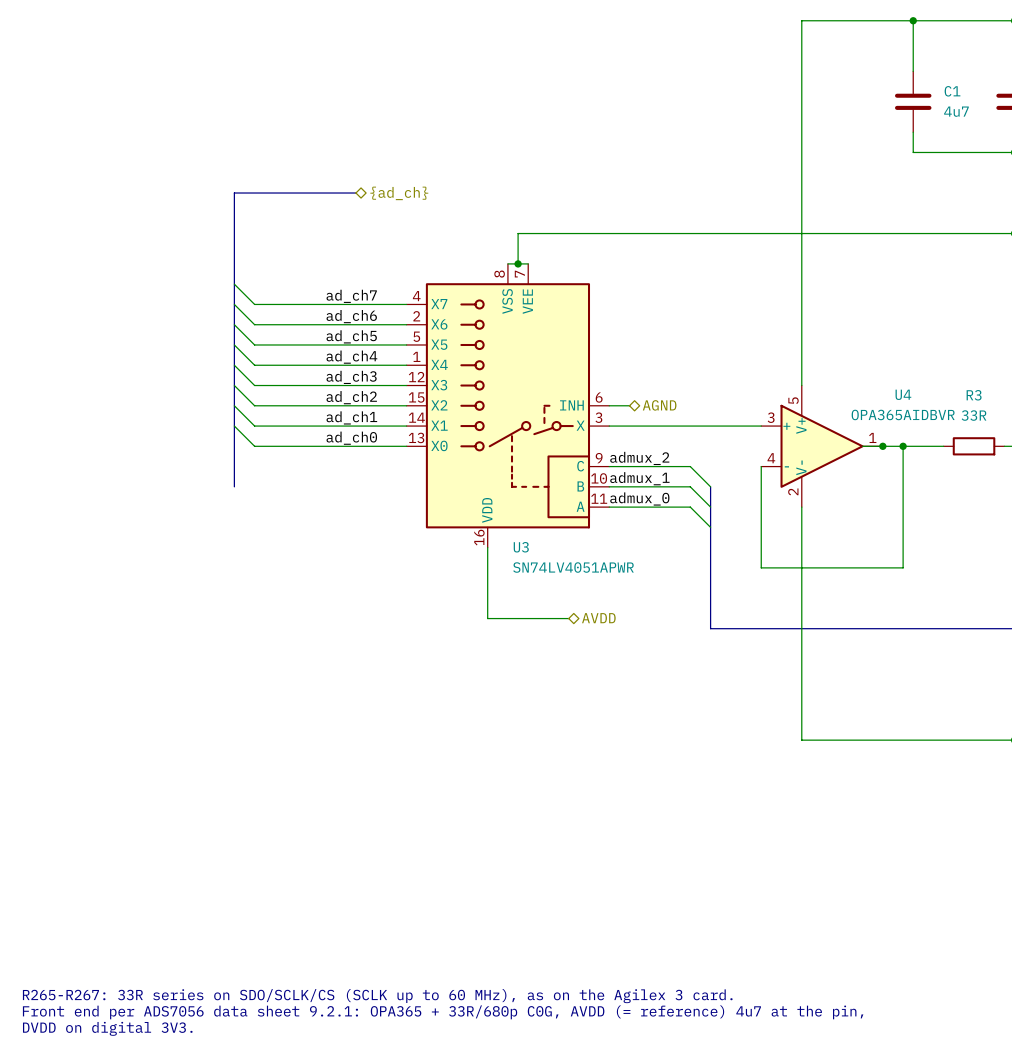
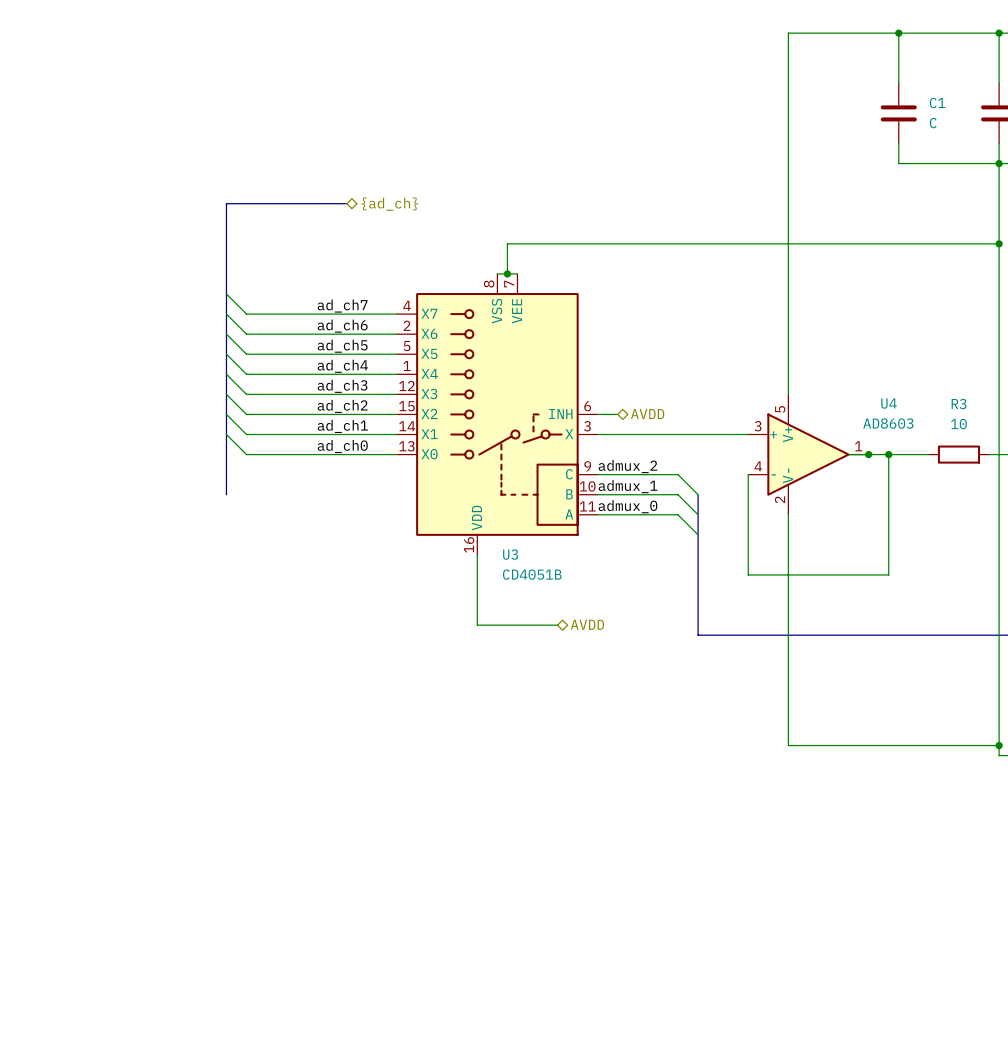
C1 value: 4u7 (956, 111) -> C (933, 123)
hierarchical label: AGND (659, 405) -> AVDD (647, 414)
U4 value: OPA365AIDBVR (903, 414) -> AD8603 (888, 423)
R3 value: 33R (974, 415) -> 10 (958, 424)
U3 value: SN74LV4051APWR (573, 567) -> CD4051B (532, 574)
text: R265-R267: 33R series on SDO/SCLK/CS (SCLK up to 60 MHz), as on the Agilex 3 card. (377, 996) -> none
text: Front end per ADS7056 data sheet 9.2.1: OPA365 + 33R/680p C0G, AVDD (= reference) 4u7 at the pin, (443, 1012) -> none
text: DVDD on digital 3V3. (107, 1028) -> none

